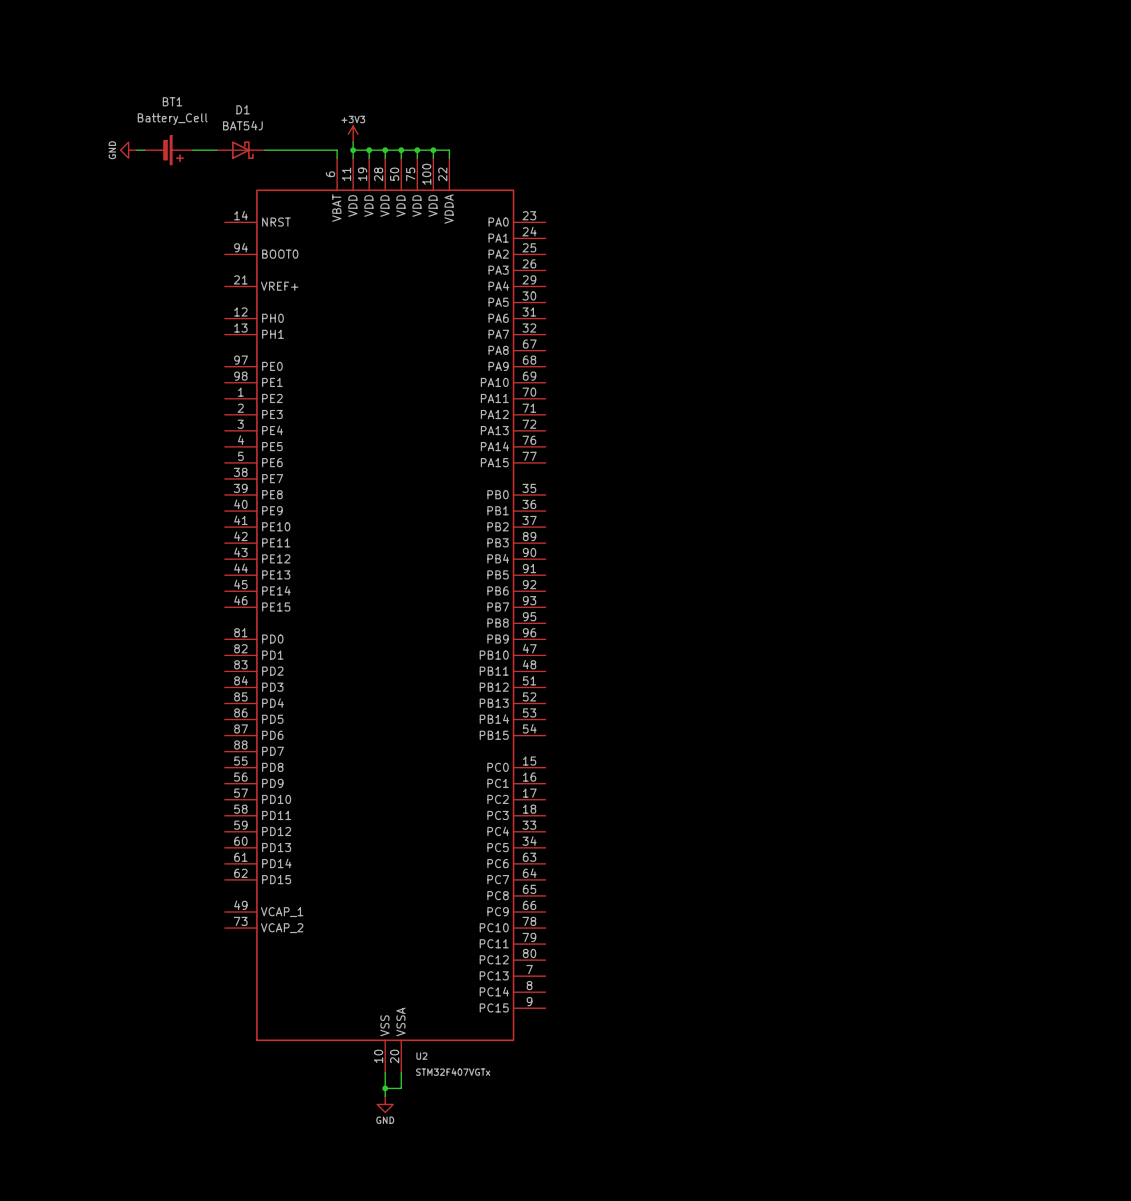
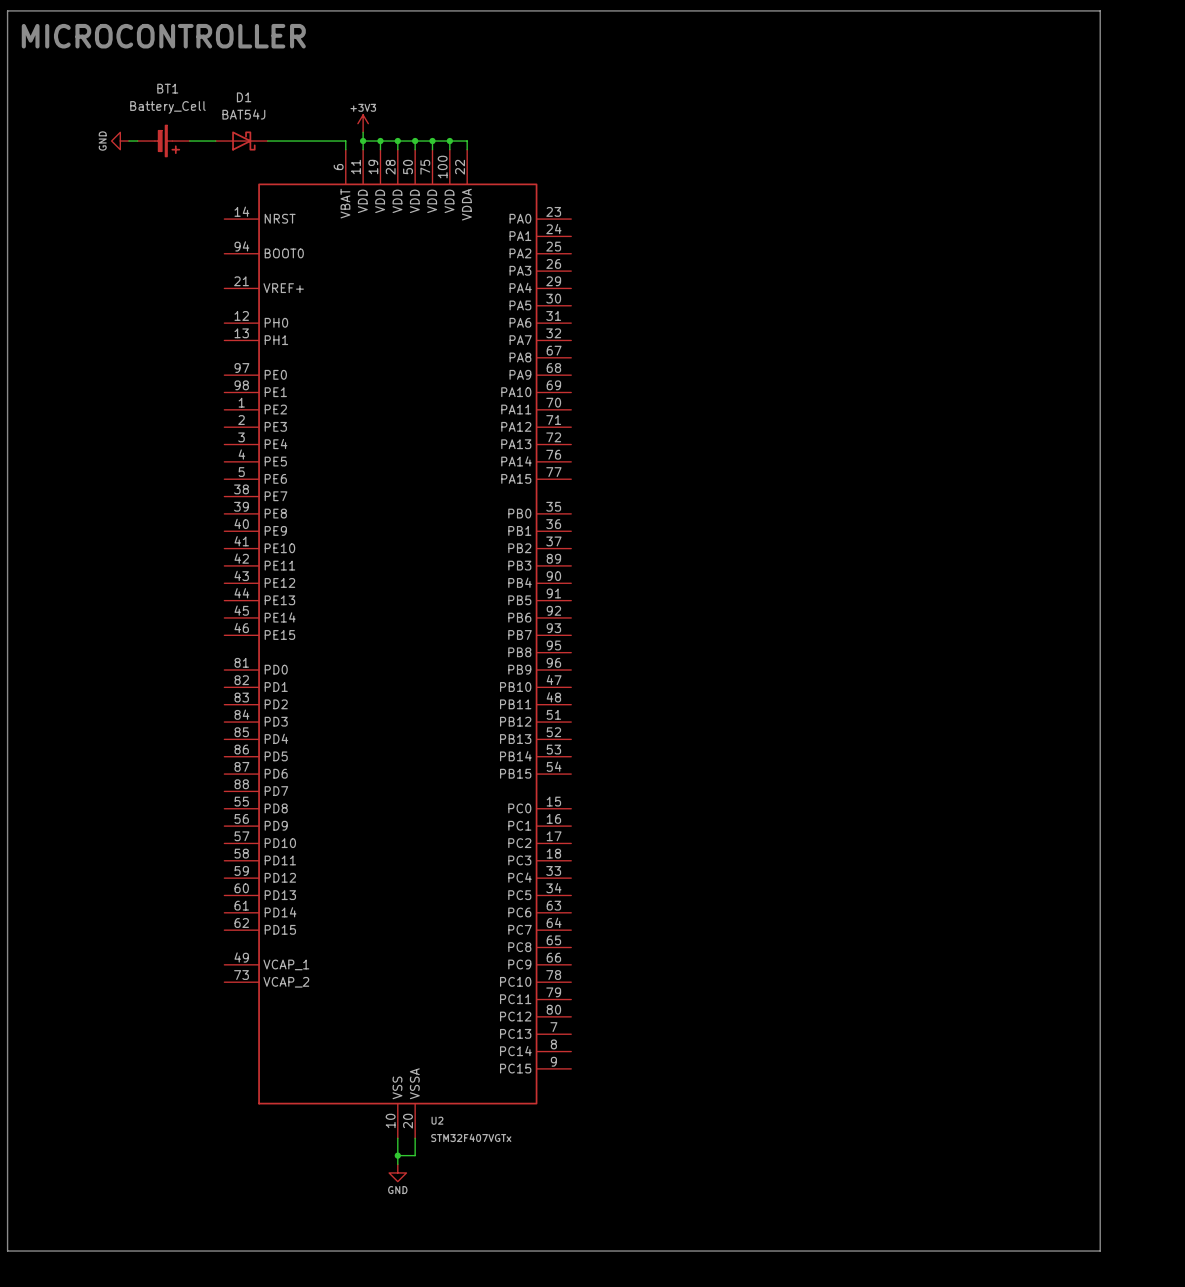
line: none -> (7, 10) (1100, 10) (1100, 1251) (7, 1251) (7, 10)
text: none -> MICROCONTROLLER (163, 36)

